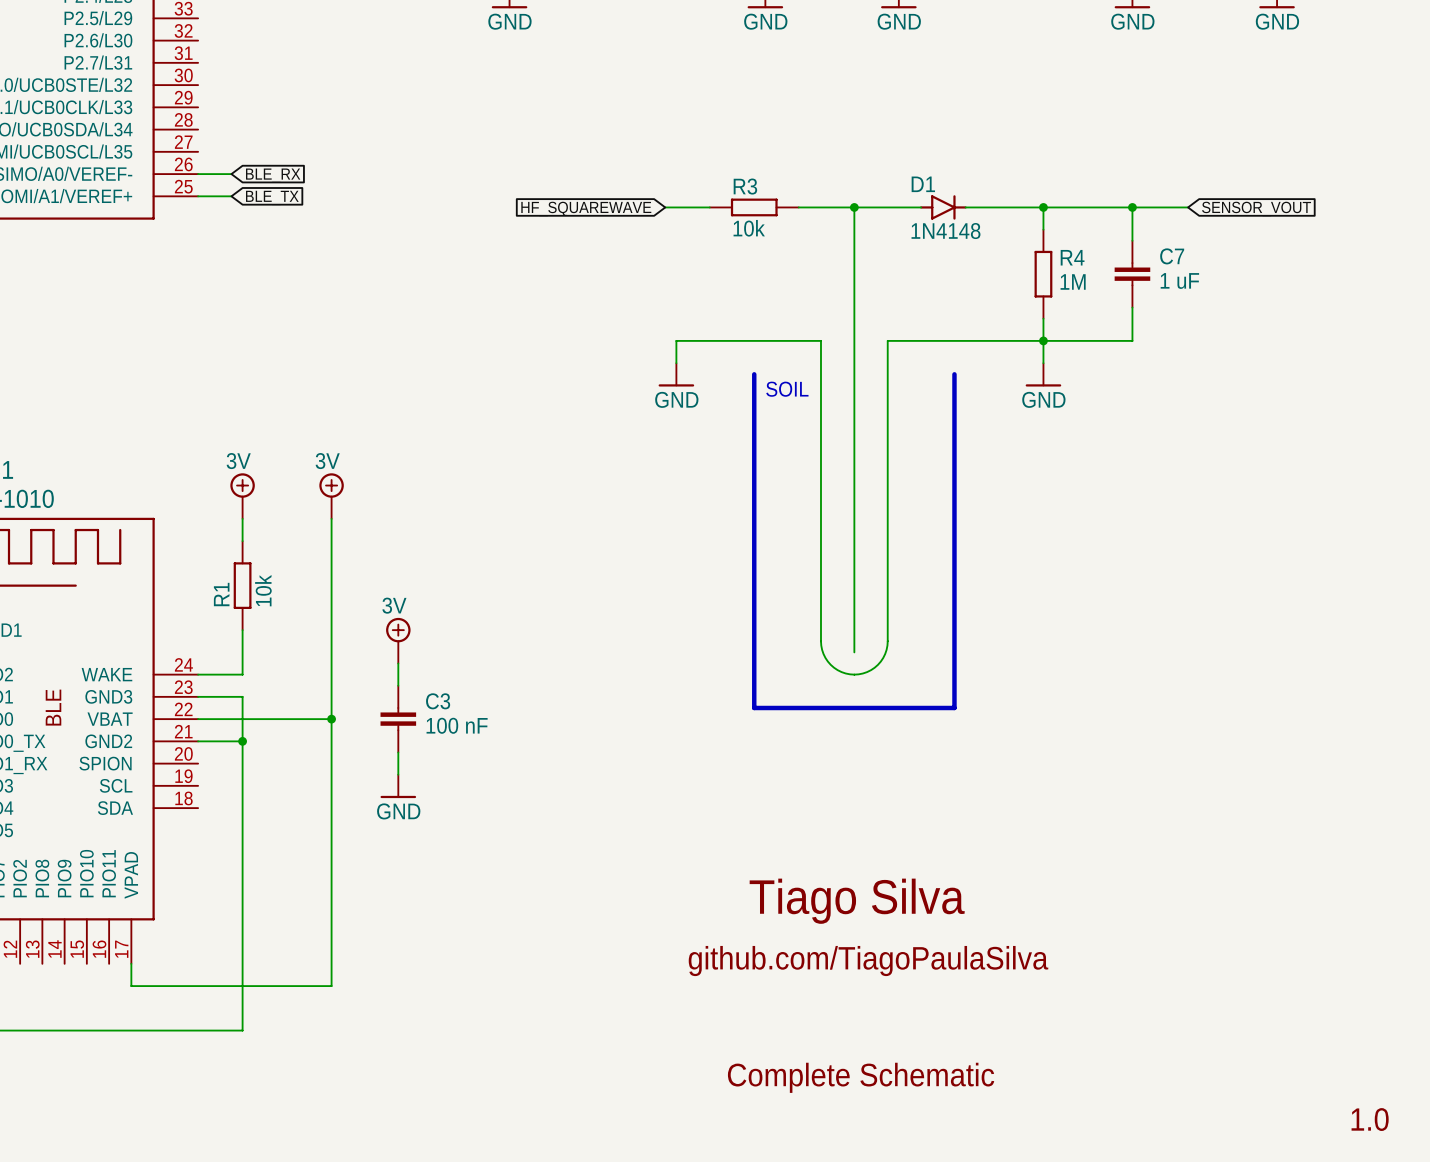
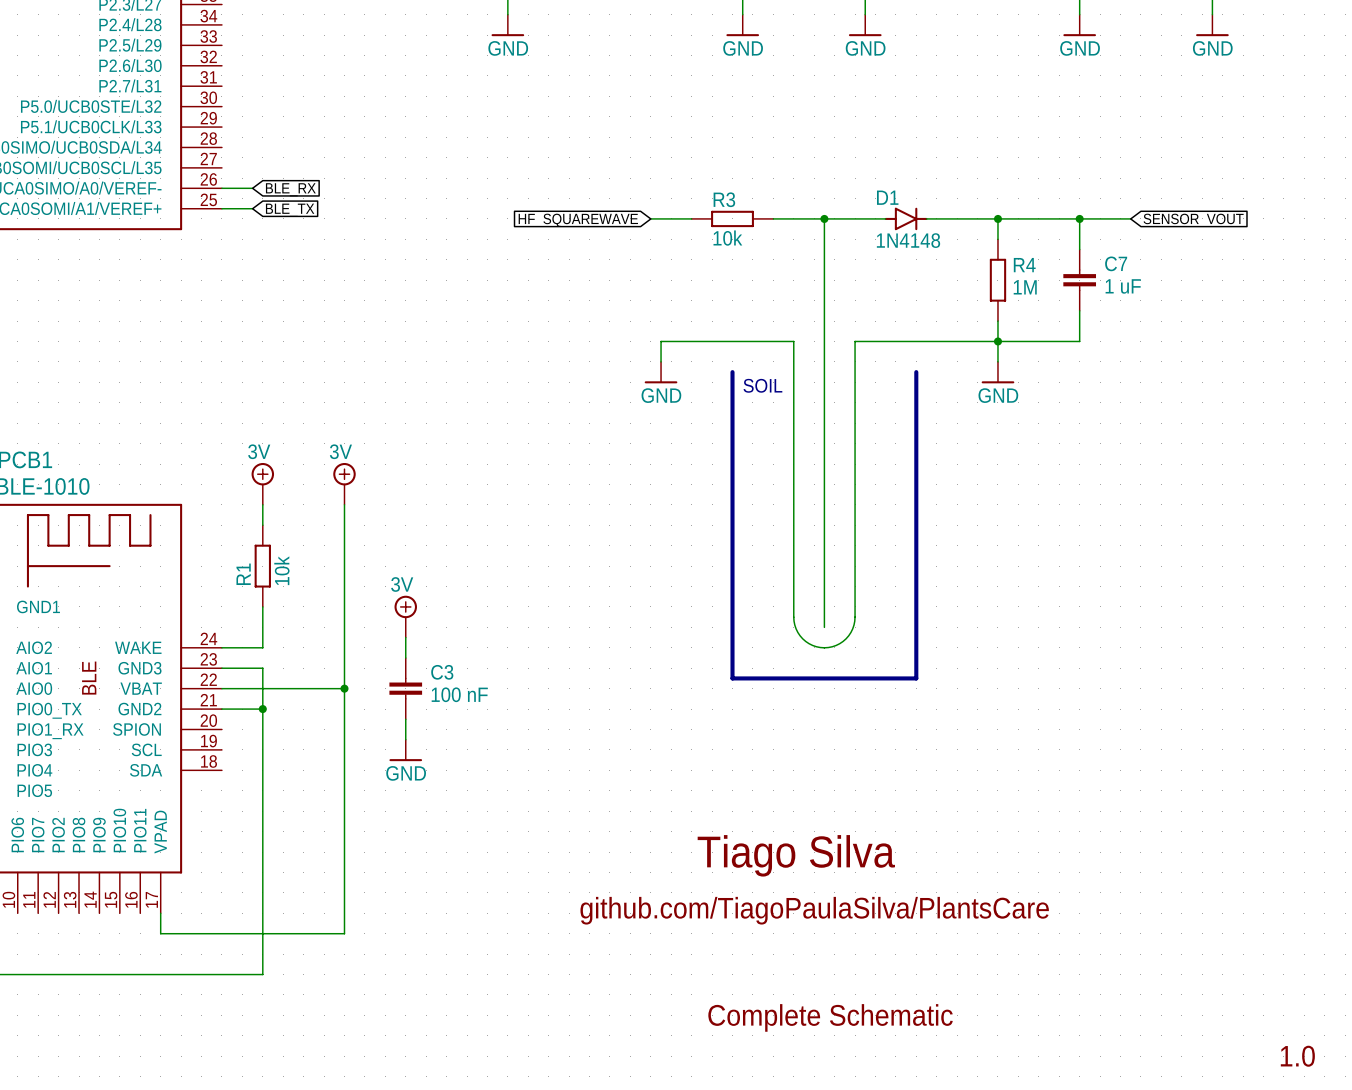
text position: Tiago Silva (857, 901) -> Tiago Silva (796, 855)
text: github.com/TiagoPaulaSilva (868, 961) -> github.com/TiagoPaulaSilva/PlantsCare (814, 910)

